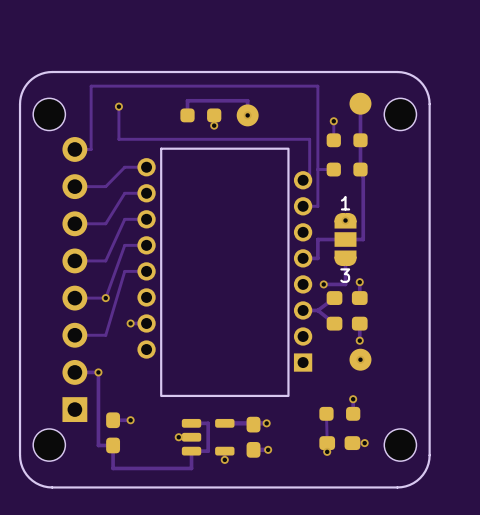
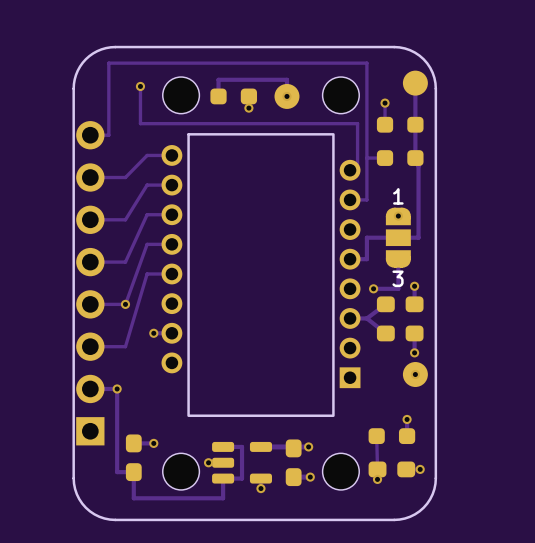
board edge: (96, 72) (52, 72) (38, 75) (24, 87) (20, 104) (21, 463) (29, 478) (43, 486) (96, 487) -> (115, 47) (97, 51) (85, 59) (77, 70) (73, 88) (74, 483) (79, 499) (89, 511) (99, 516) (115, 519)
board edge: (341, 72) (397, 72) (409, 74) (420, 81) (425, 88) (429, 104) (428, 463) (420, 478) (405, 486) (341, 487) -> (394, 47) (410, 50) (423, 59) (432, 72) (435, 88) (435, 483) (430, 499) (419, 511) (404, 518) (394, 519)
part position: (49, 114) -> (181, 95)
part position: (400, 114) -> (340, 95)
part position: (49, 445) -> (181, 471)
part position: (400, 445) -> (340, 471)

